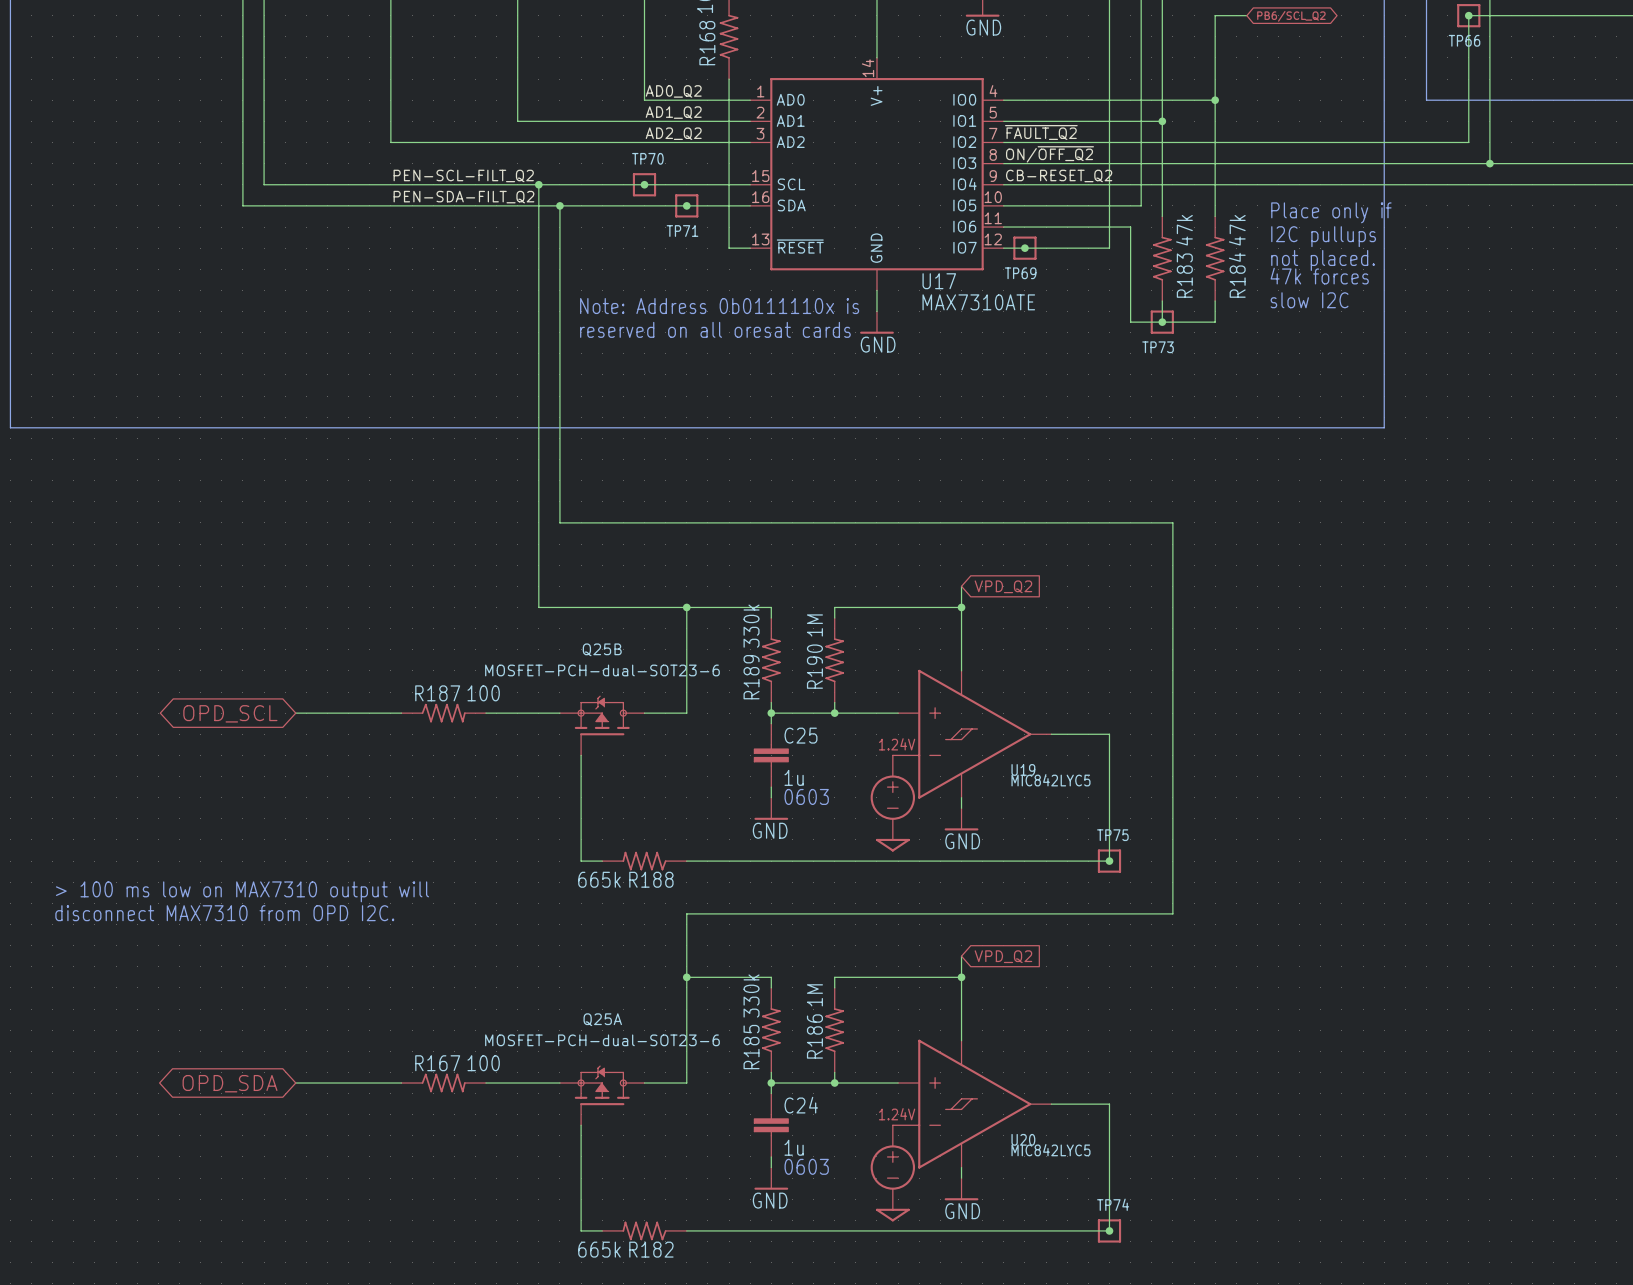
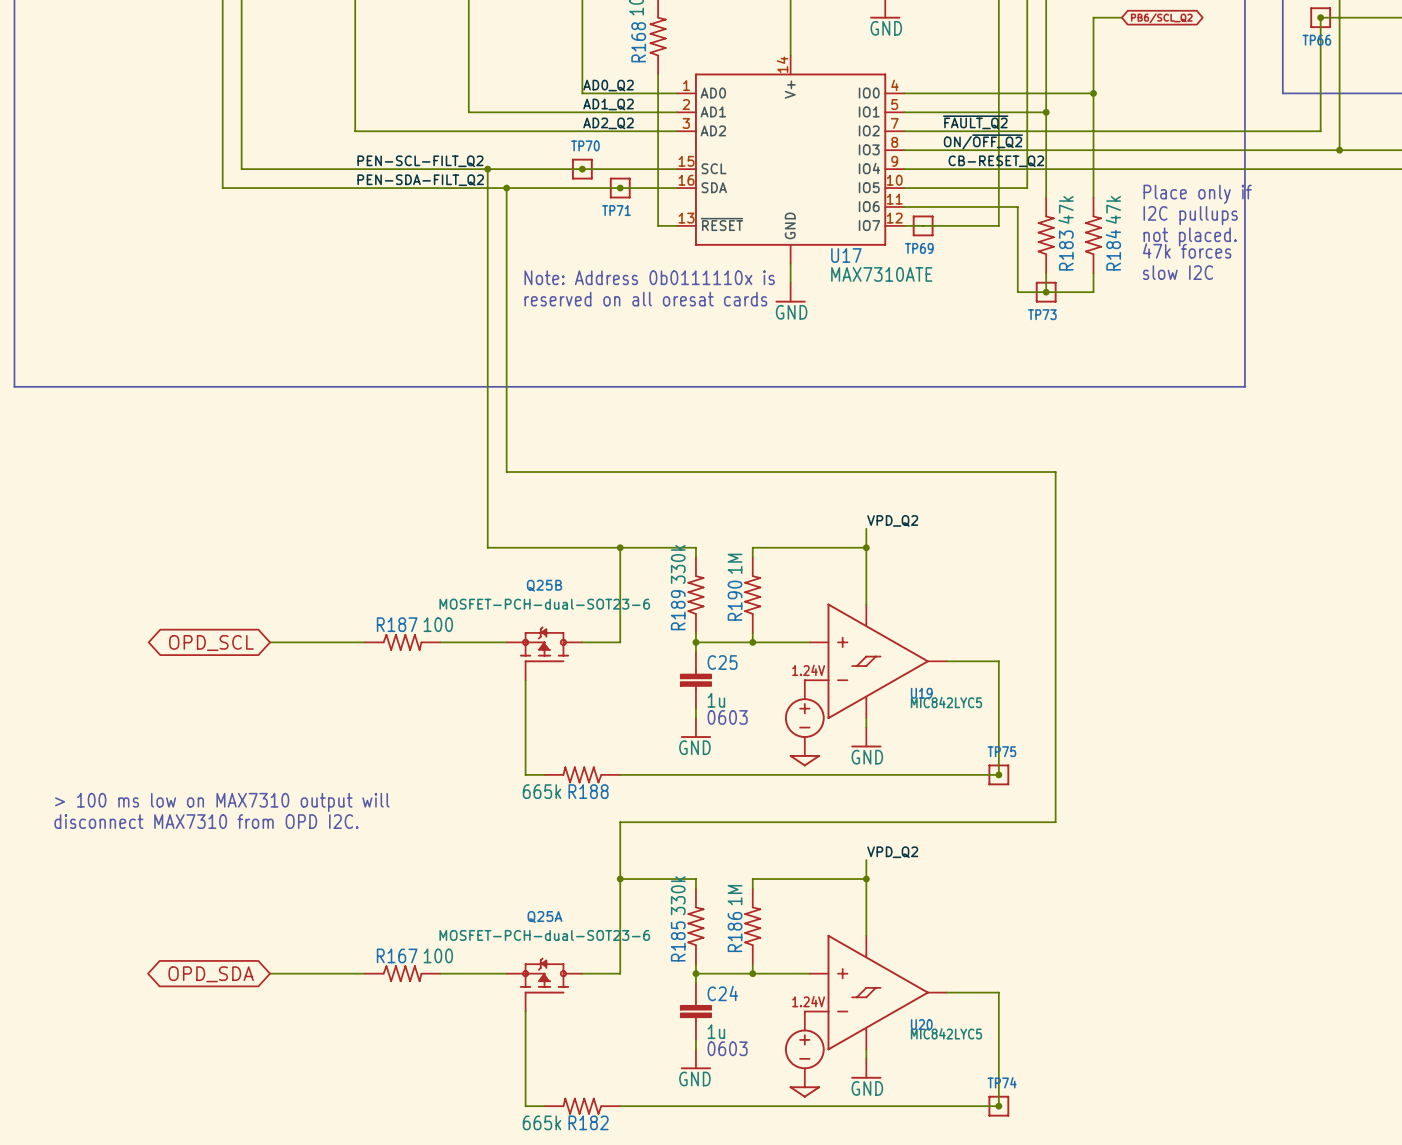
label position: ~{FAULT_Q2} (1041, 132) -> ~{FAULT_Q2} (975, 122)
label position: ON/~{OFF_Q2} (1049, 154) -> ON/~{OFF_Q2} (983, 141)
label position: CB-RESET_Q2 (1059, 175) -> CB-RESET_Q2 (996, 161)
junction: (1024, 248) -> none
label: none -> VPD_Q2 (892, 520)
global label: VPD_Q2 (1003, 586) -> none
label: none -> VPD_Q2 (892, 852)
global label: VPD_Q2 (1003, 956) -> none

